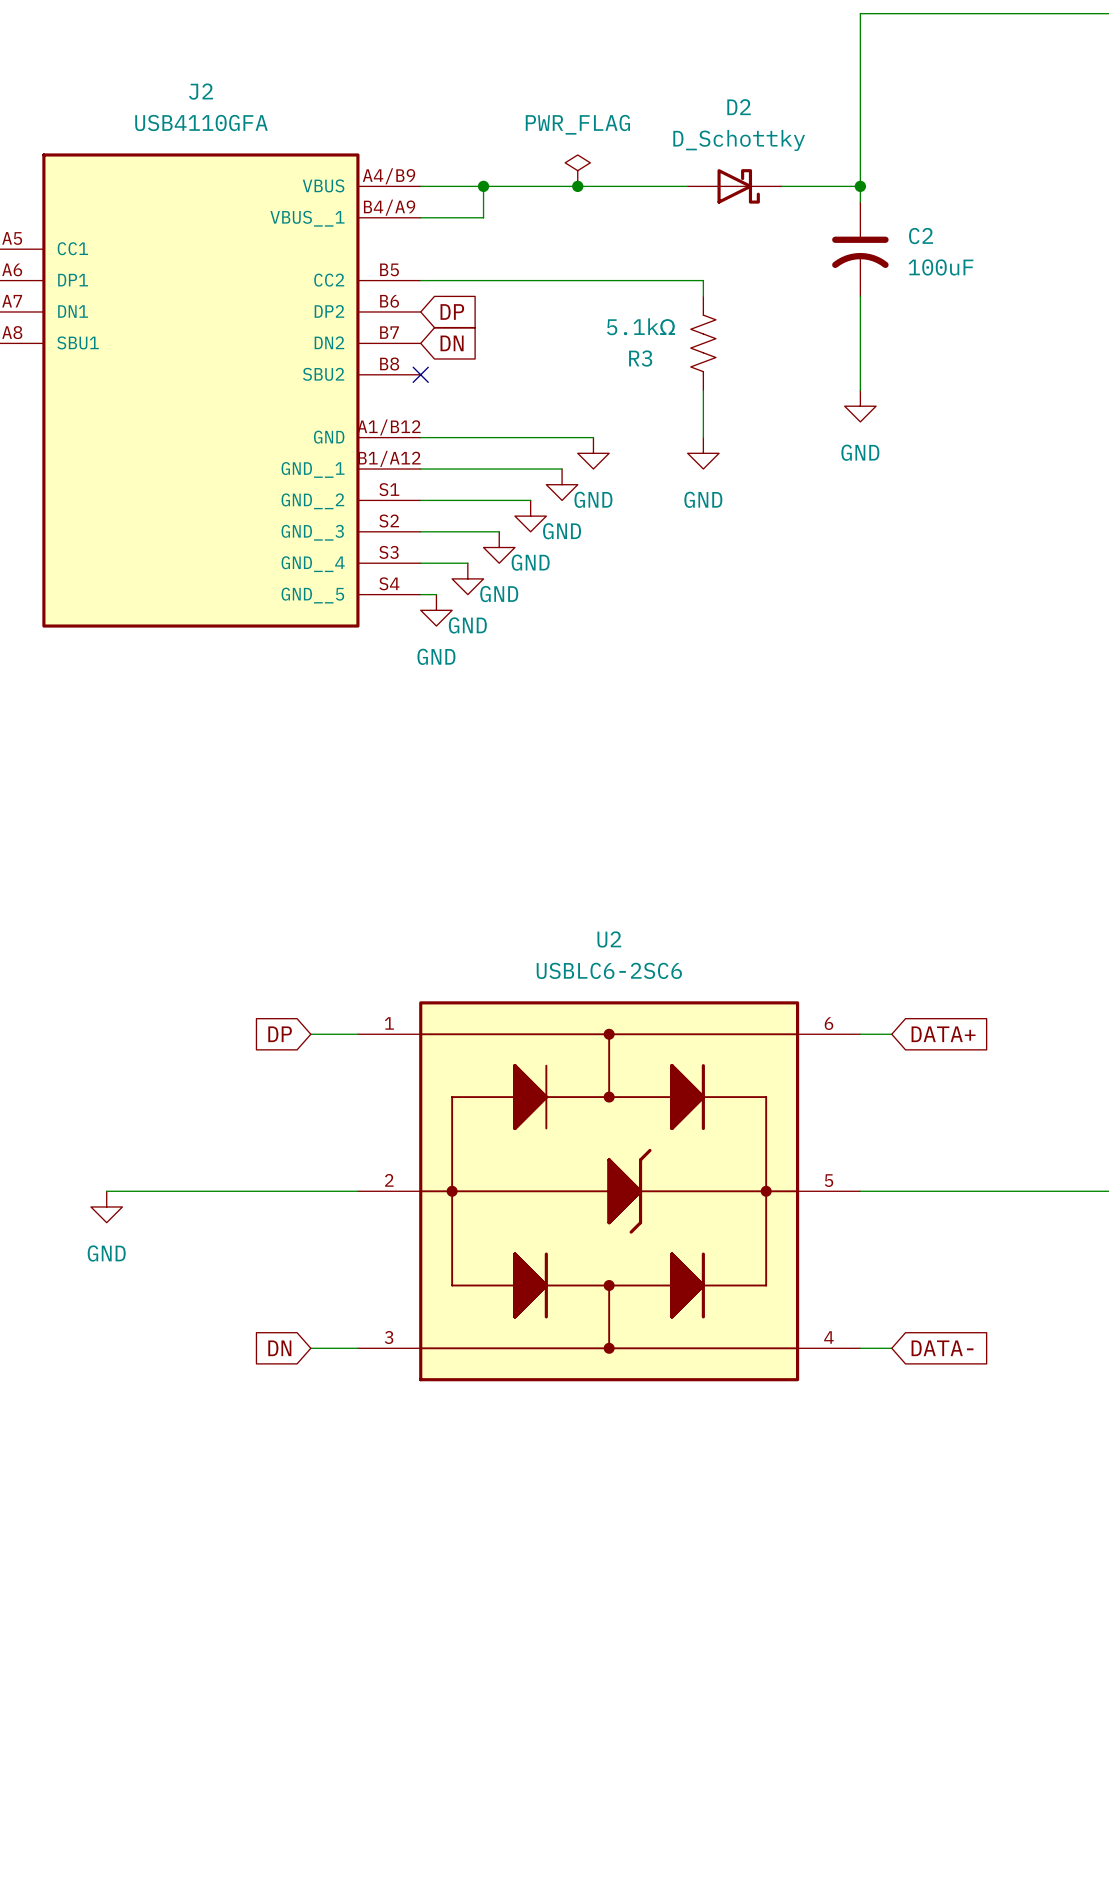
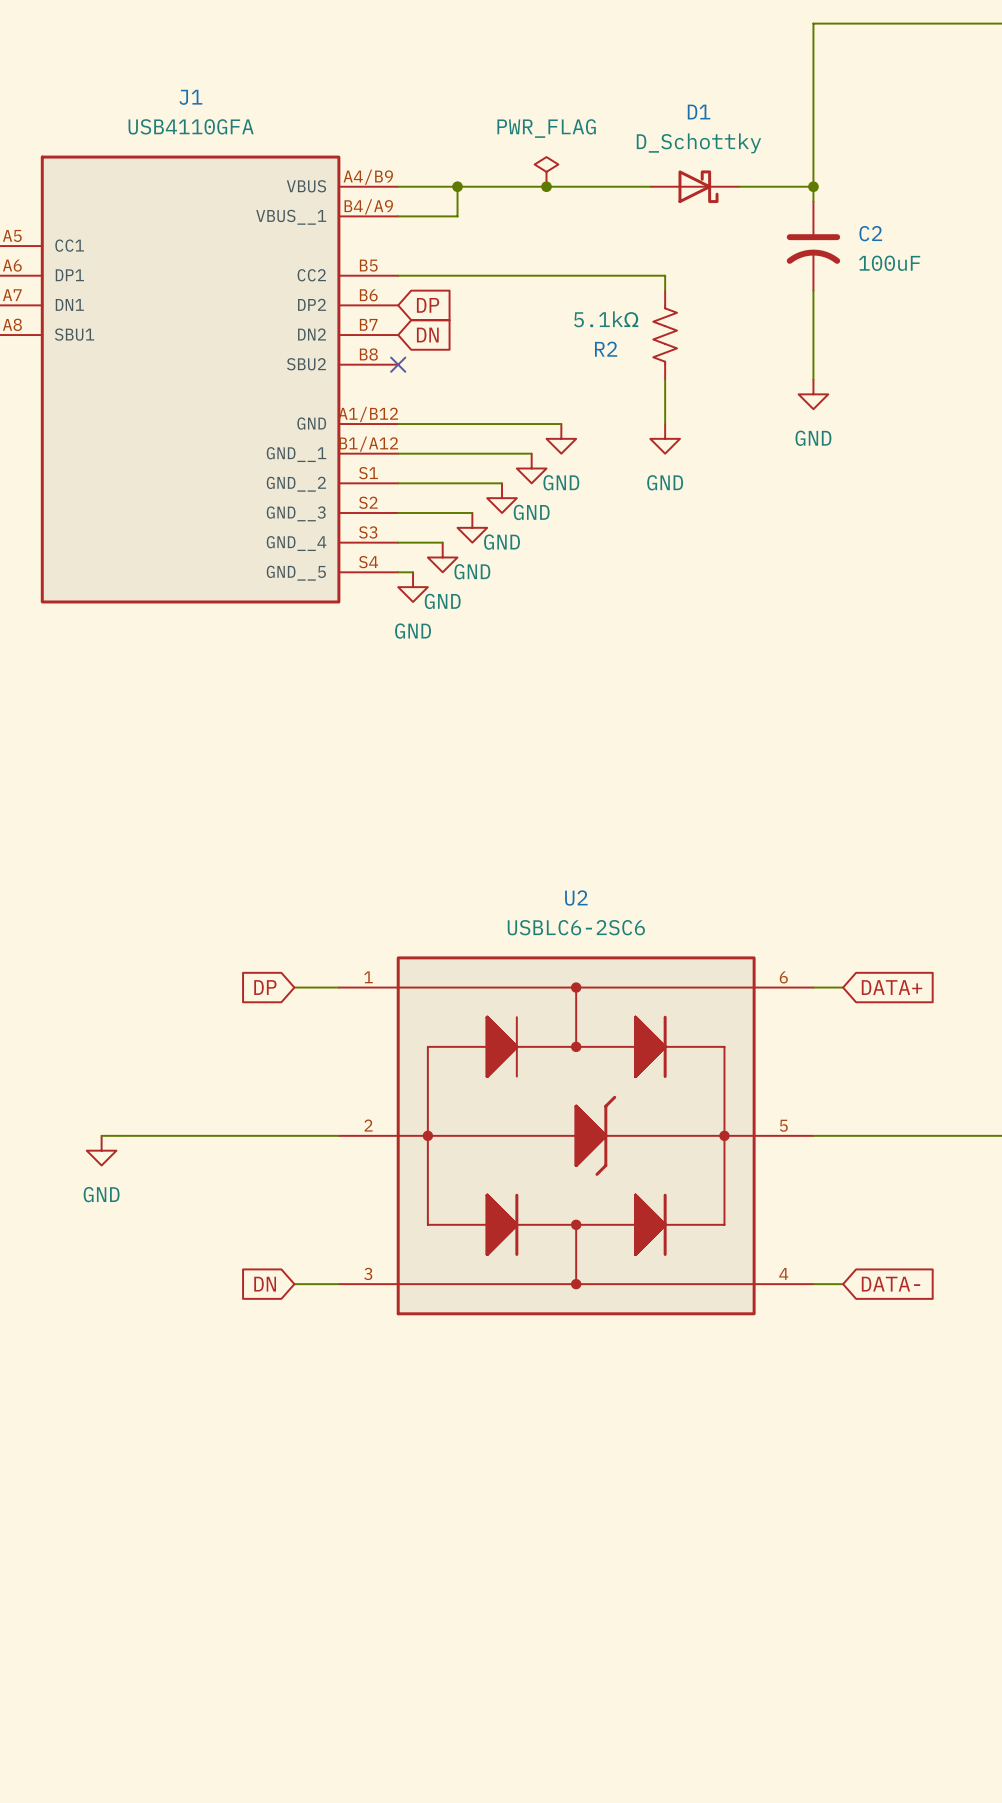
J2 name: J2 (201, 91) -> J1 (190, 97)
D2 name: D2 (739, 107) -> D1 (699, 112)
R3 name: R3 (640, 358) -> R2 (606, 349)

